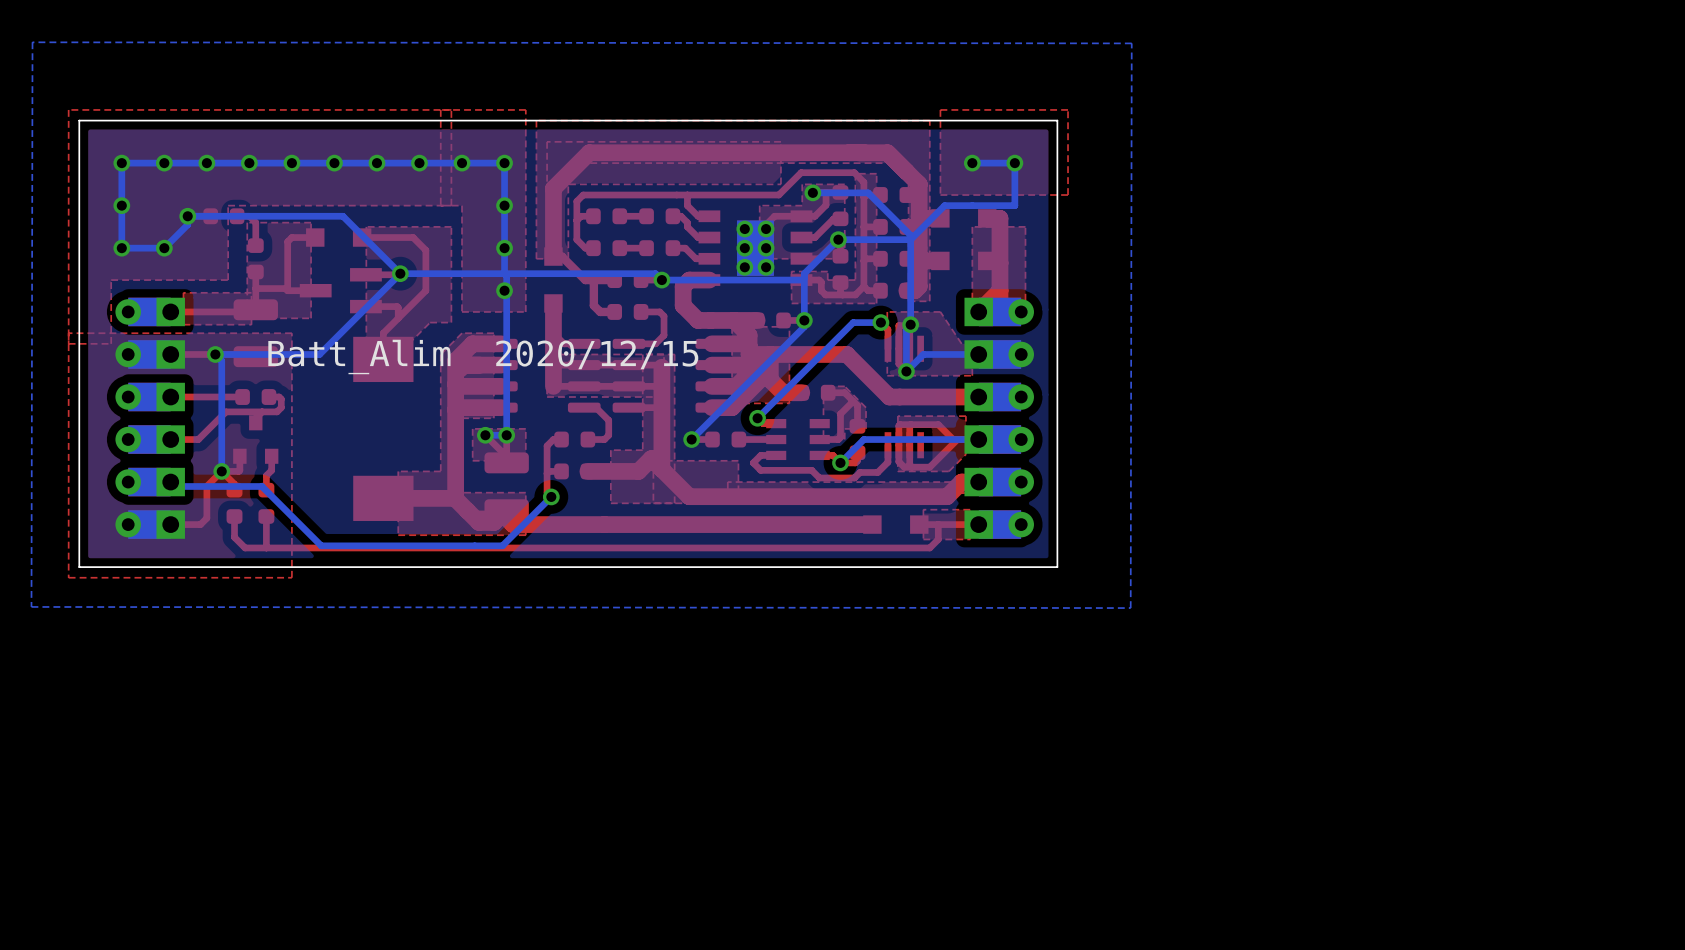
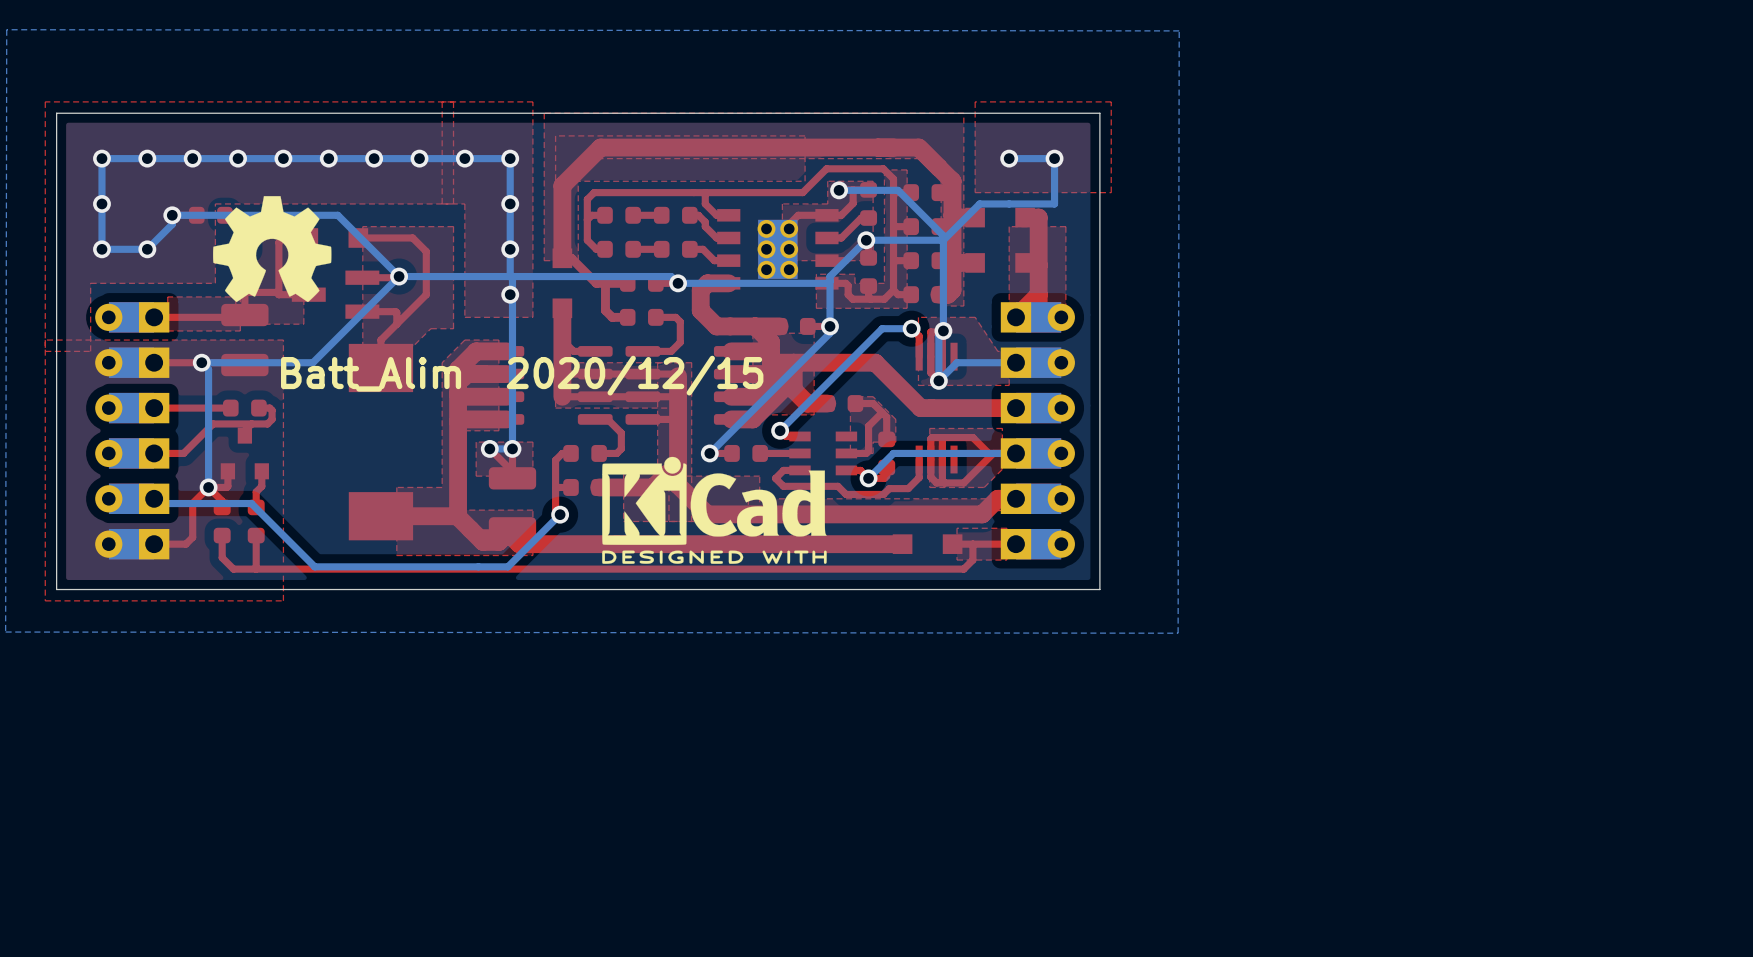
drawing: none -> [213, 196, 332, 303]
text position: Batt_Alim 2020/12/15 (483, 356) -> Batt_Alim 2020/12/15 (522, 375)
drawing: none -> [602, 456, 827, 564]

